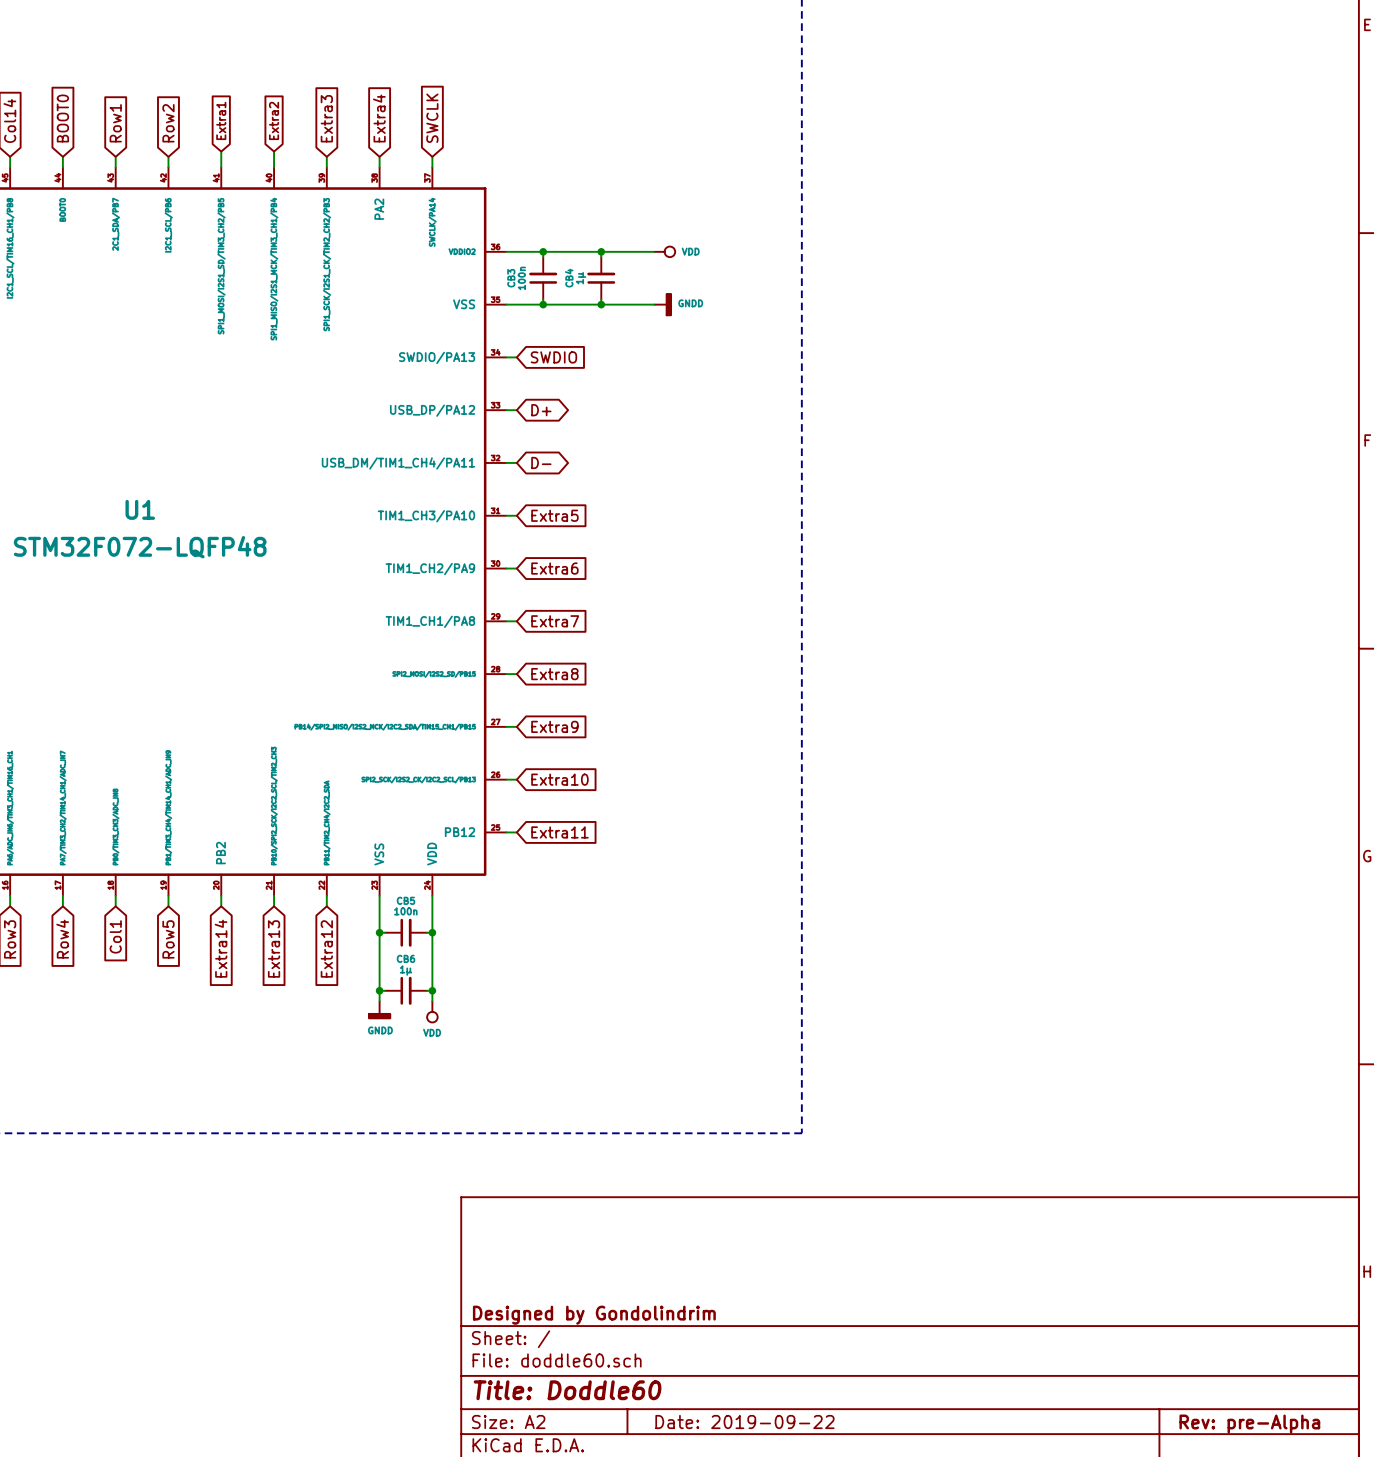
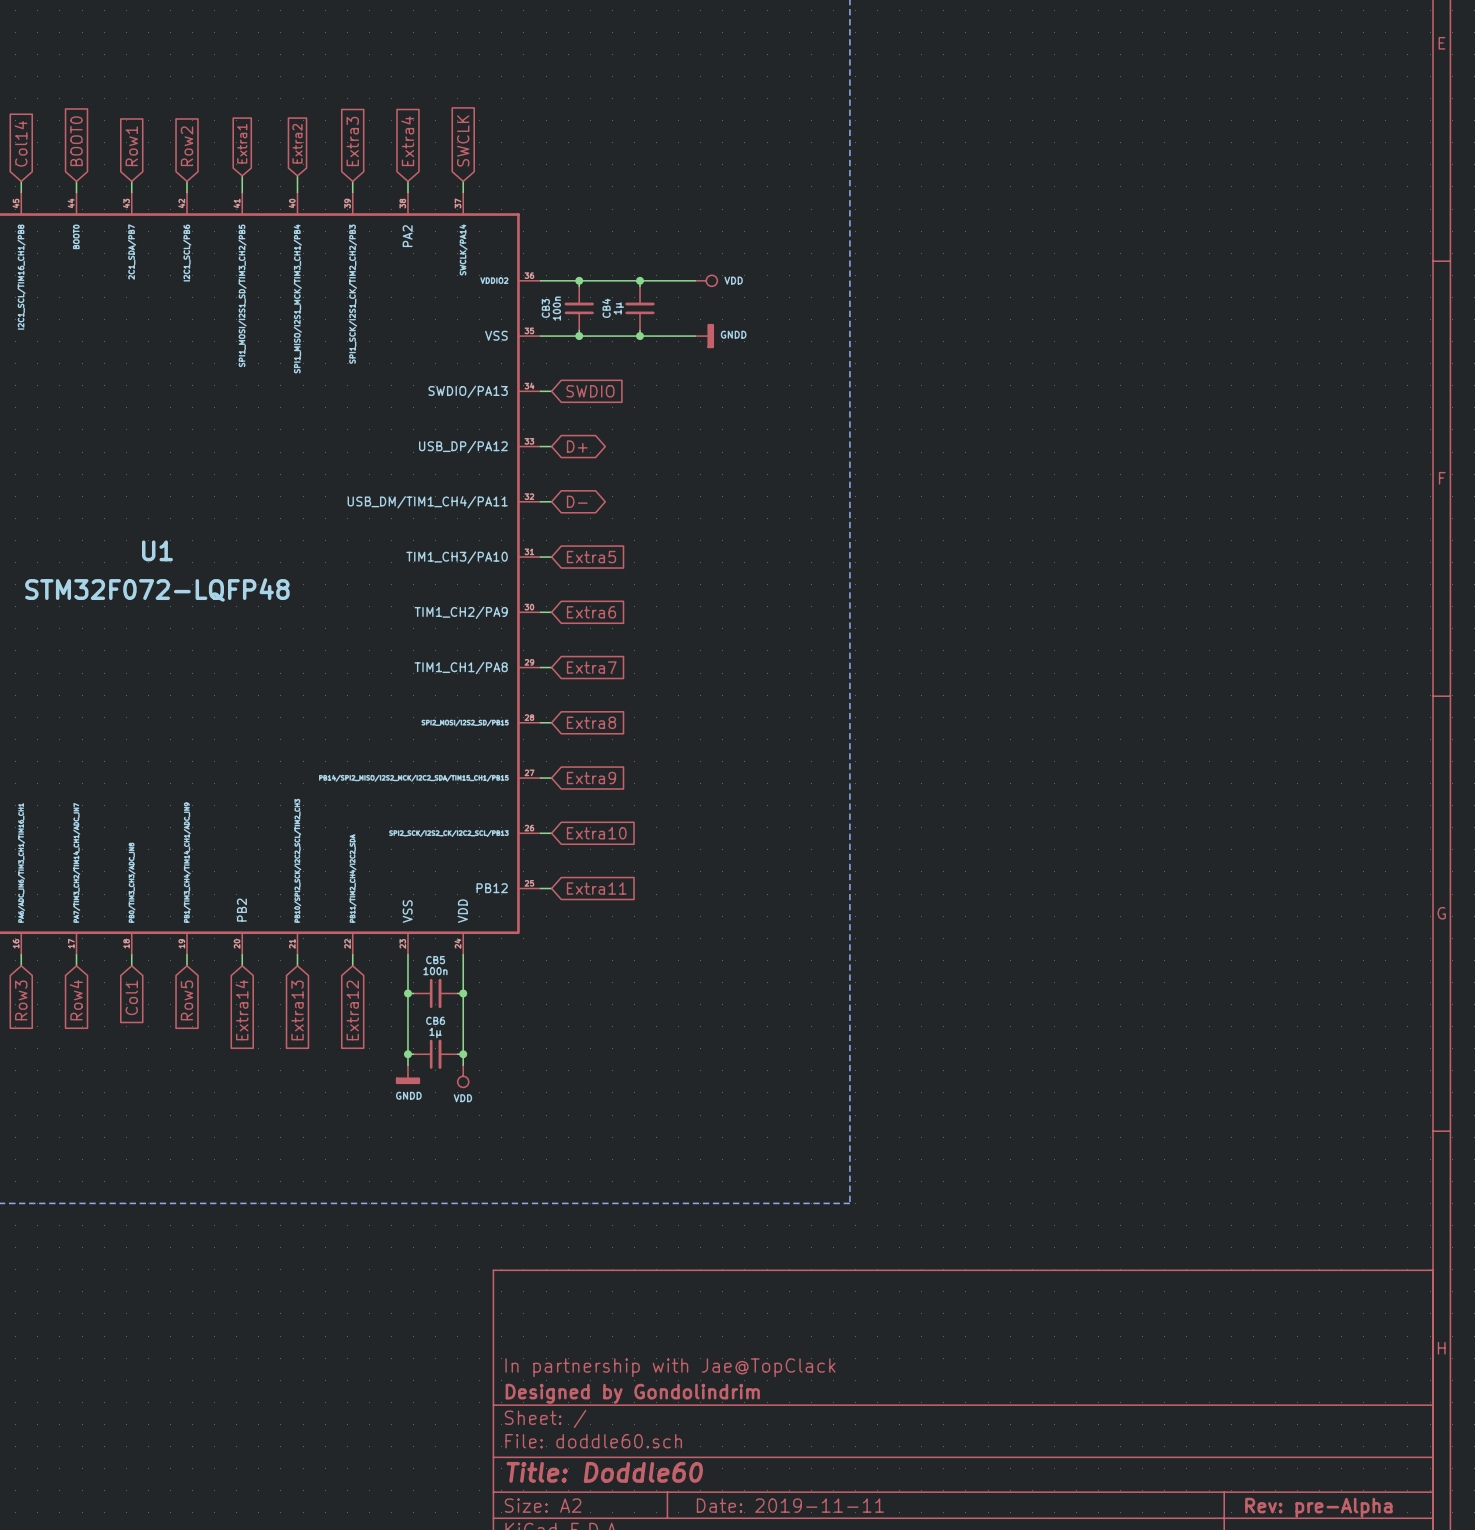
title block: none -> In partnership with Jae@TopClack (670, 1367)
title block: Date: 2019-09-22 (744, 1422) -> Date: 2019-11-11 (790, 1505)

